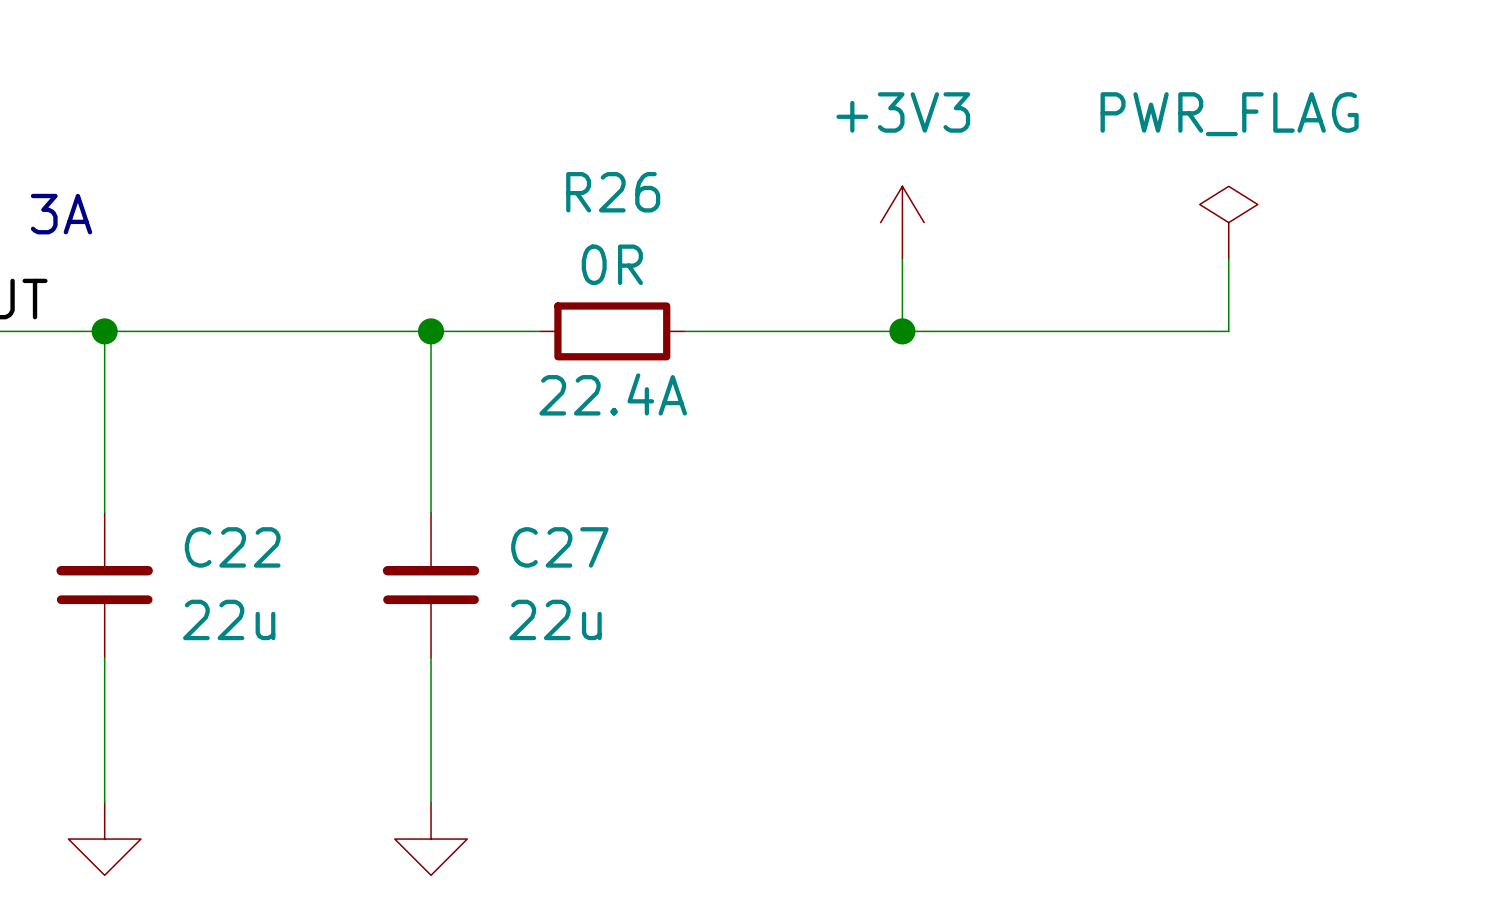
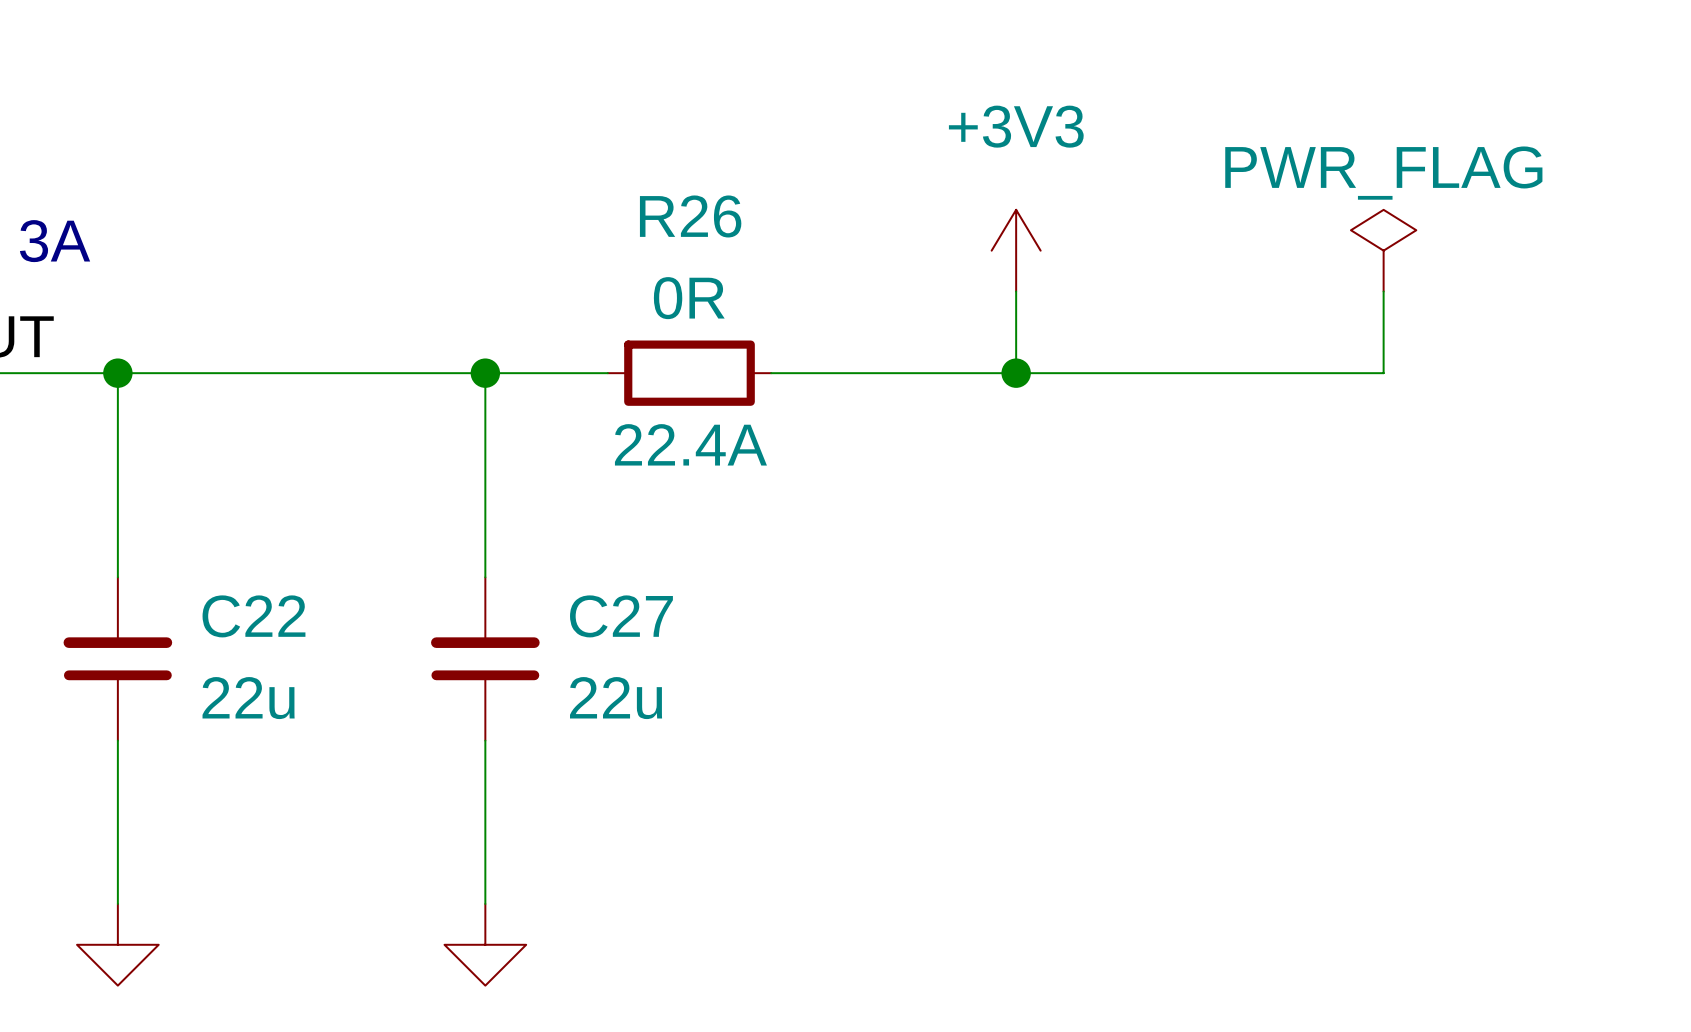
power symbol text position: PWR_FLAG (1229, 114) -> PWR_FLAG (1383, 173)

